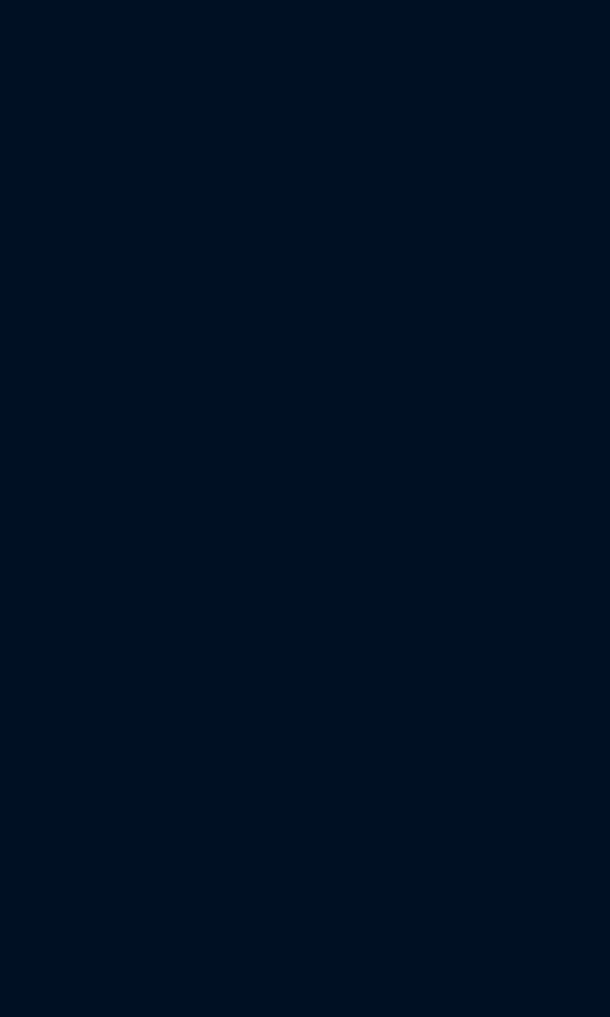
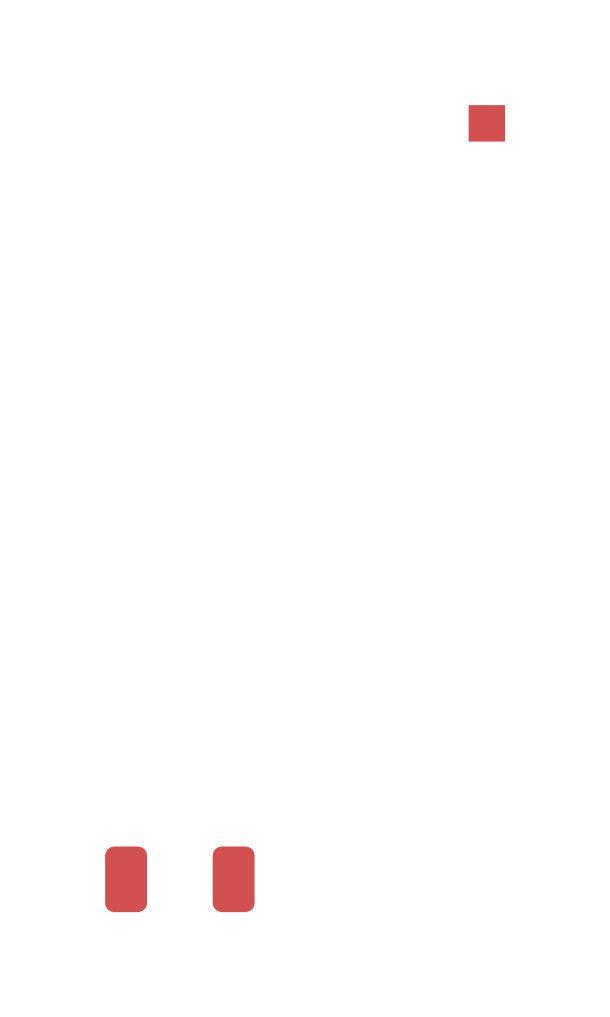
part: none -> (486, 123)
part: none -> (179, 879)

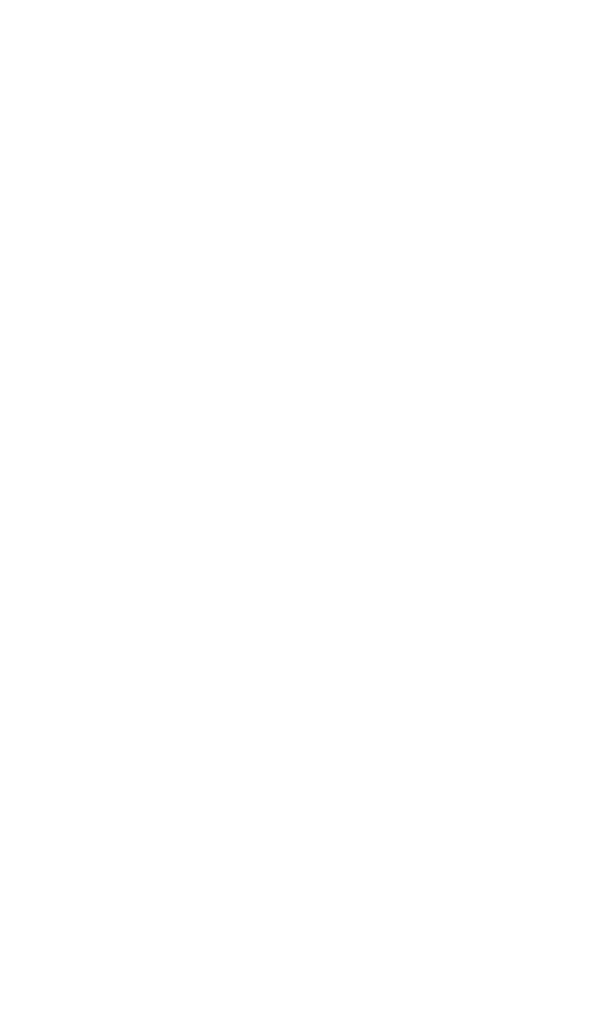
part: (486, 123) -> none
part: (179, 879) -> none

